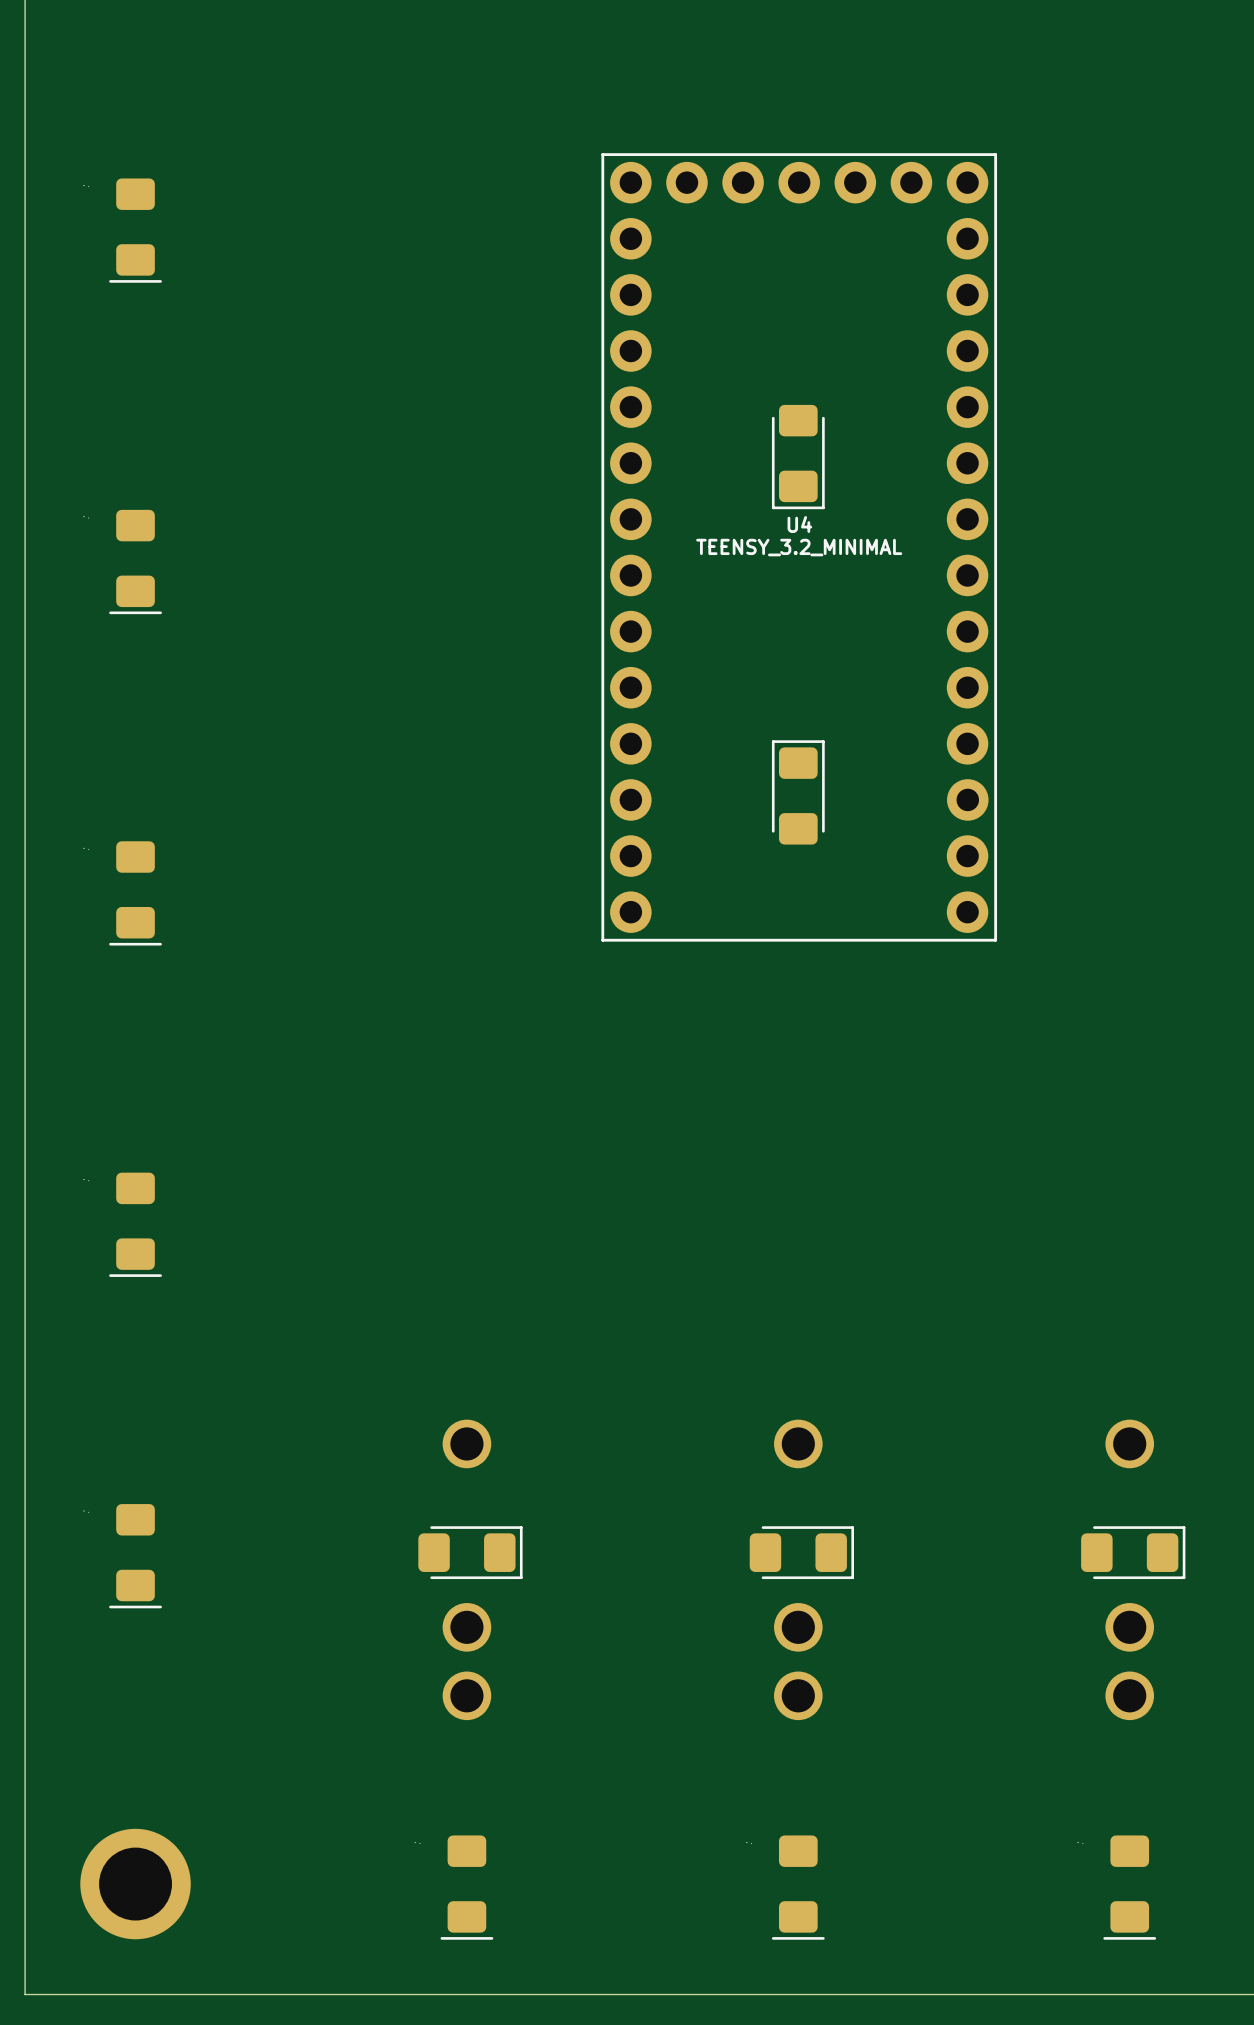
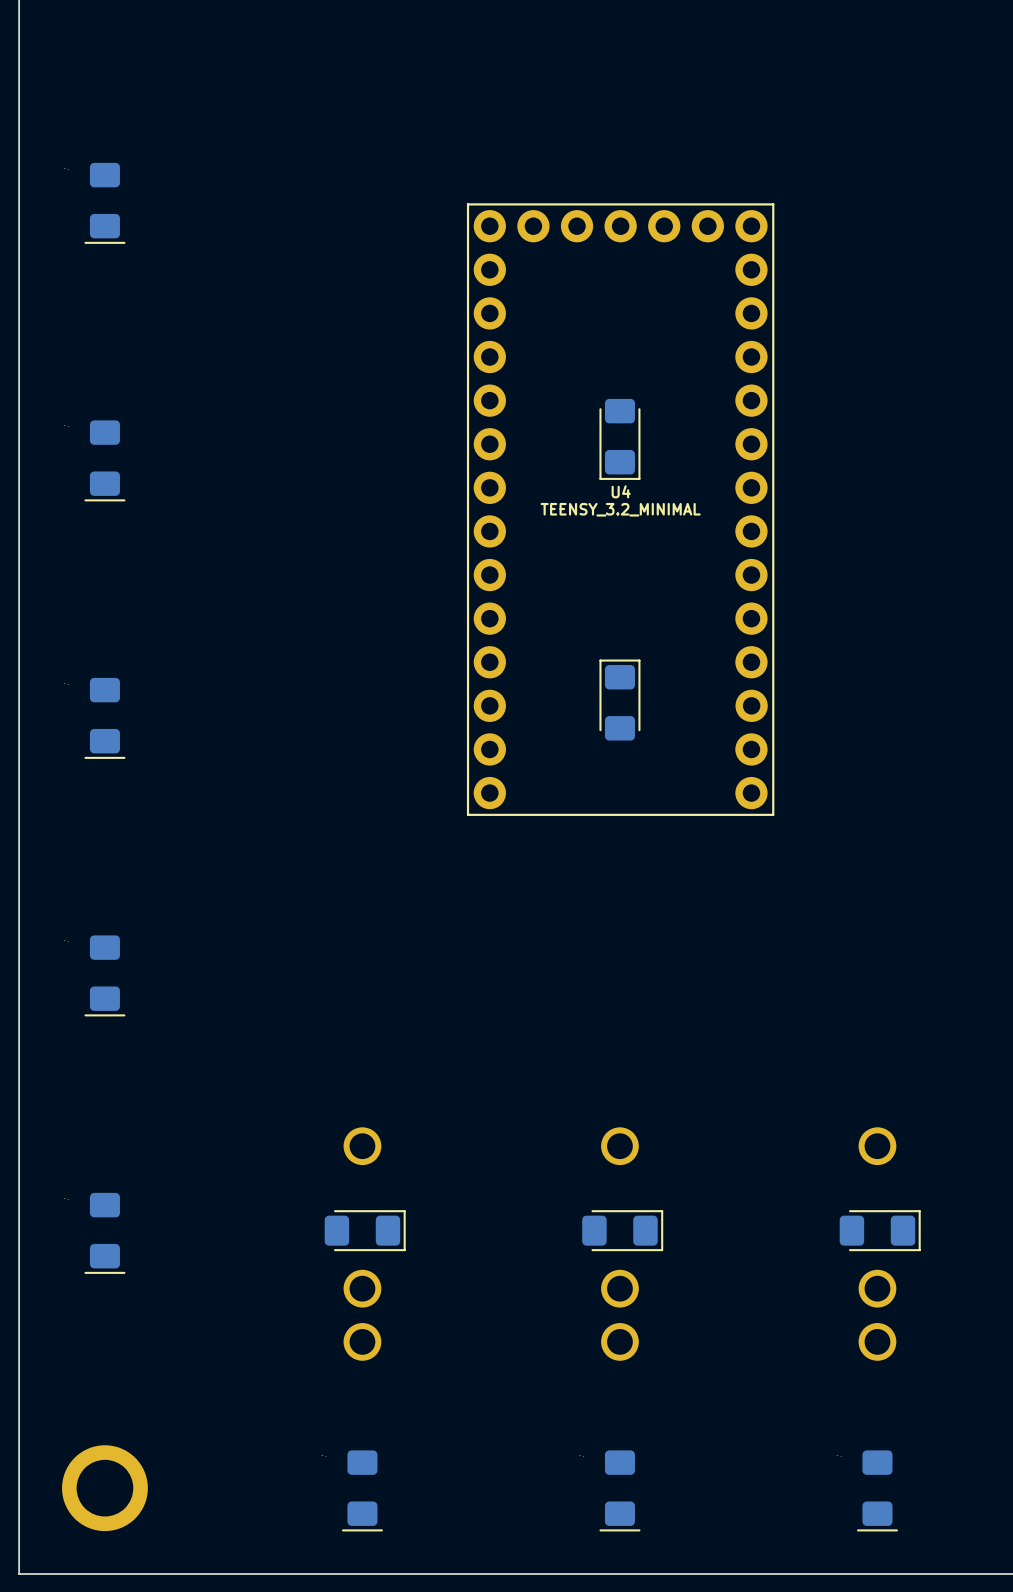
part position: (798, 457) -> (619, 439)
U4 position: (799, 547) -> (620, 509)
part position: (798, 792) -> (619, 700)

